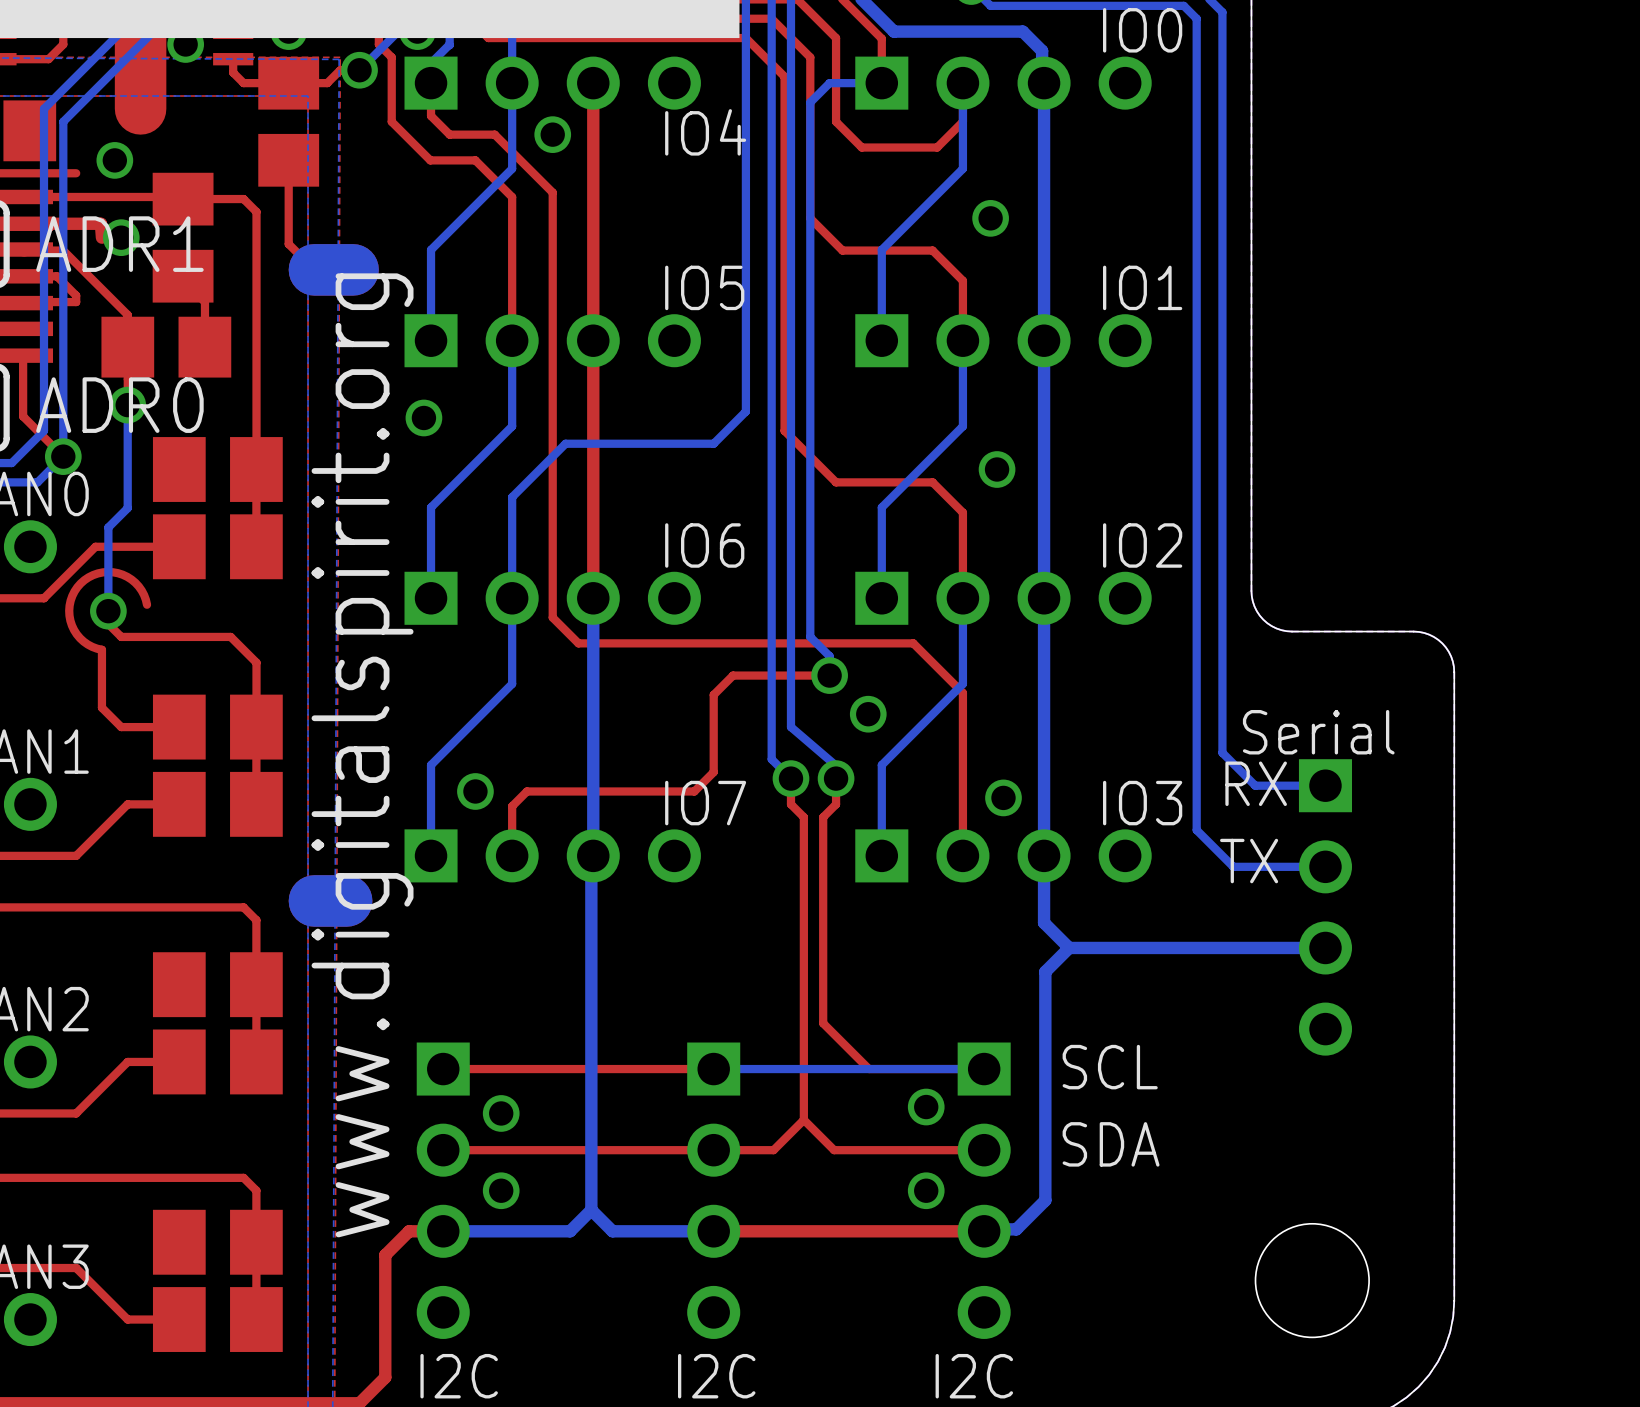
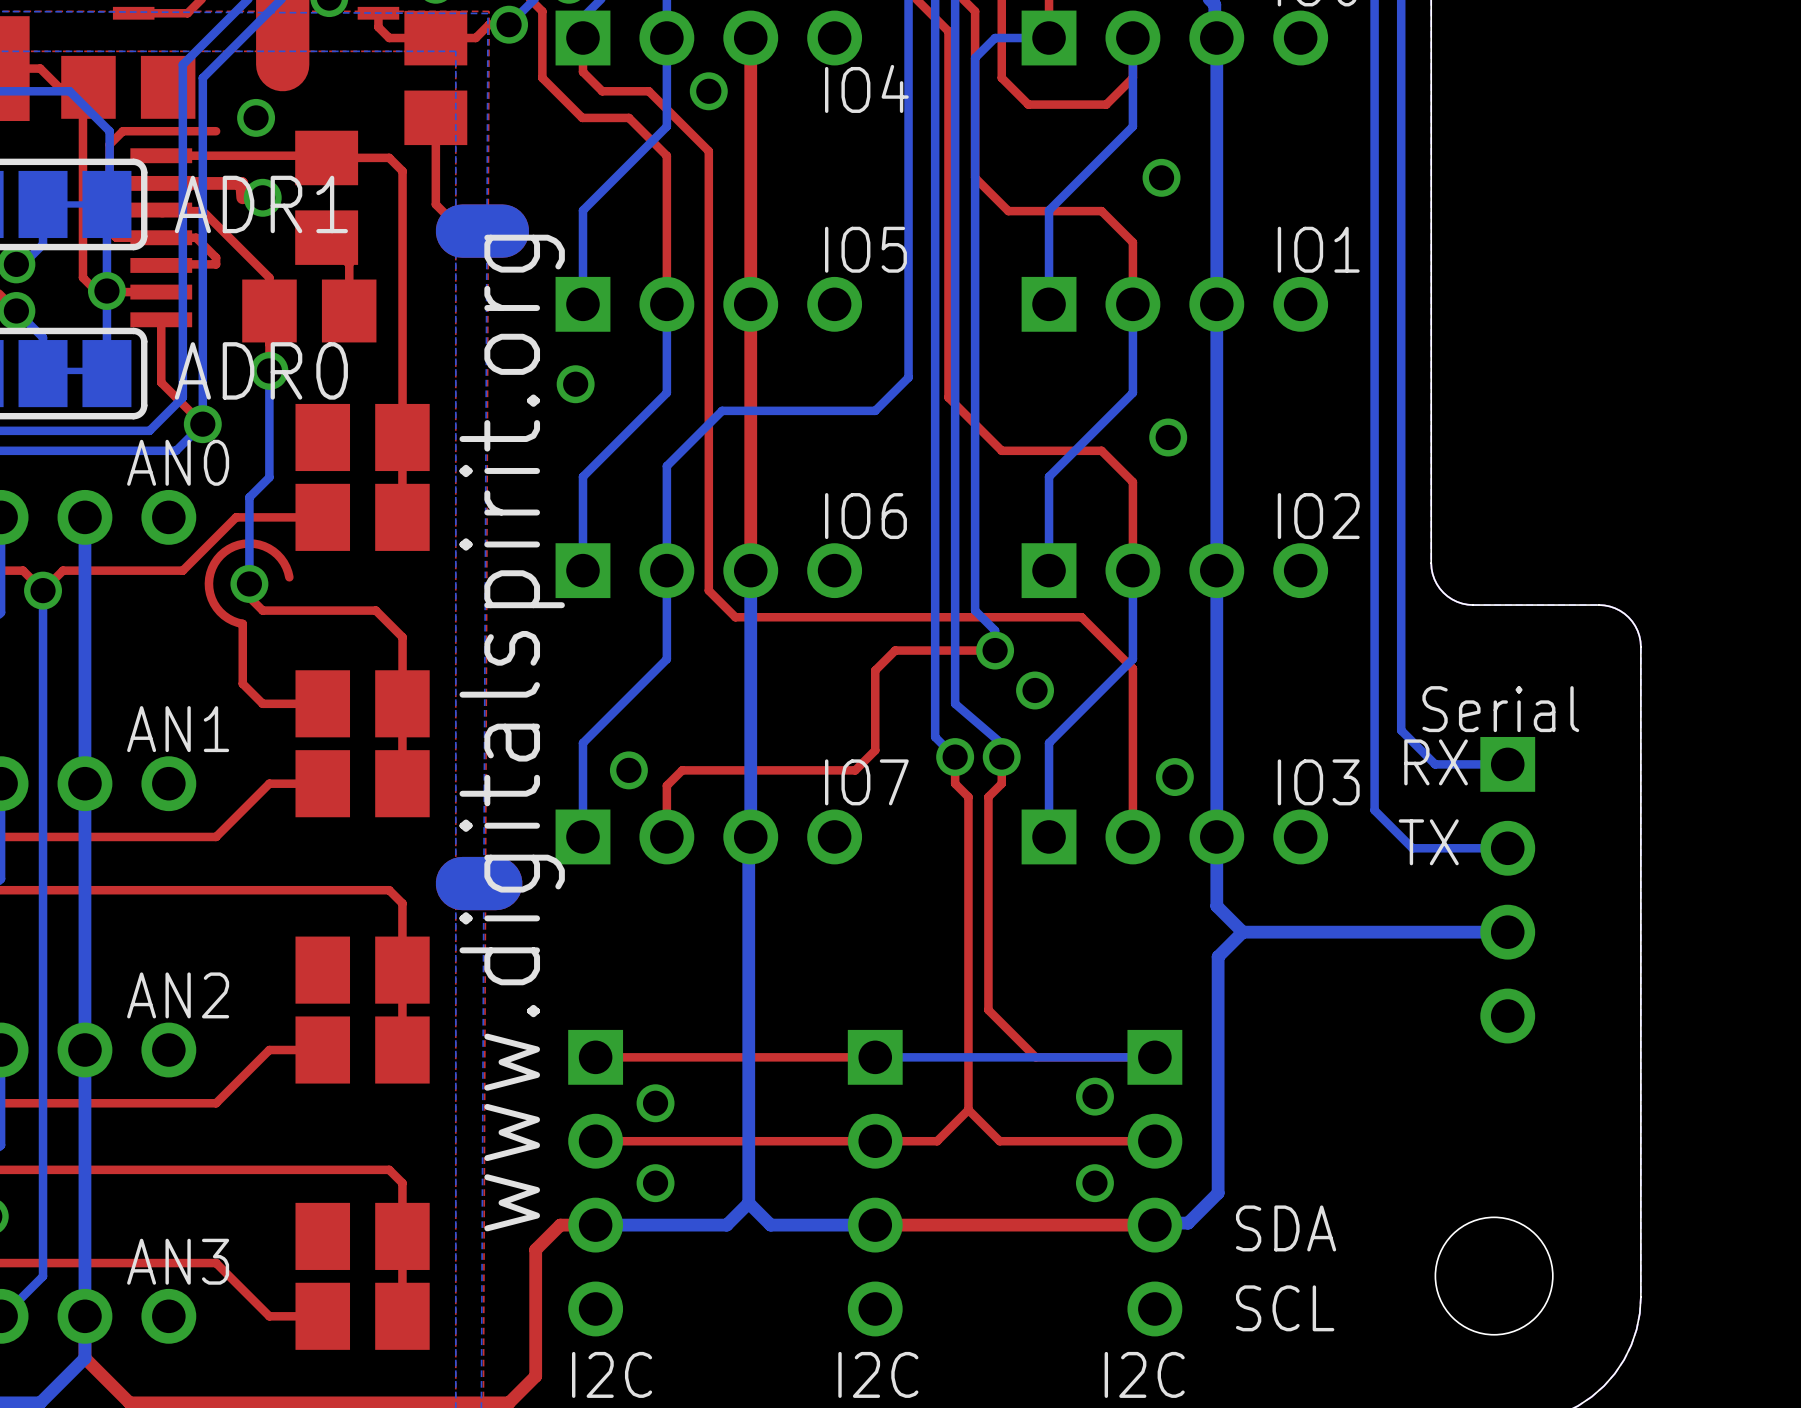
text position: SCL (1110, 1067) -> SCL (1285, 1308)
text position: SDA (1111, 1144) -> SDA (1286, 1228)

